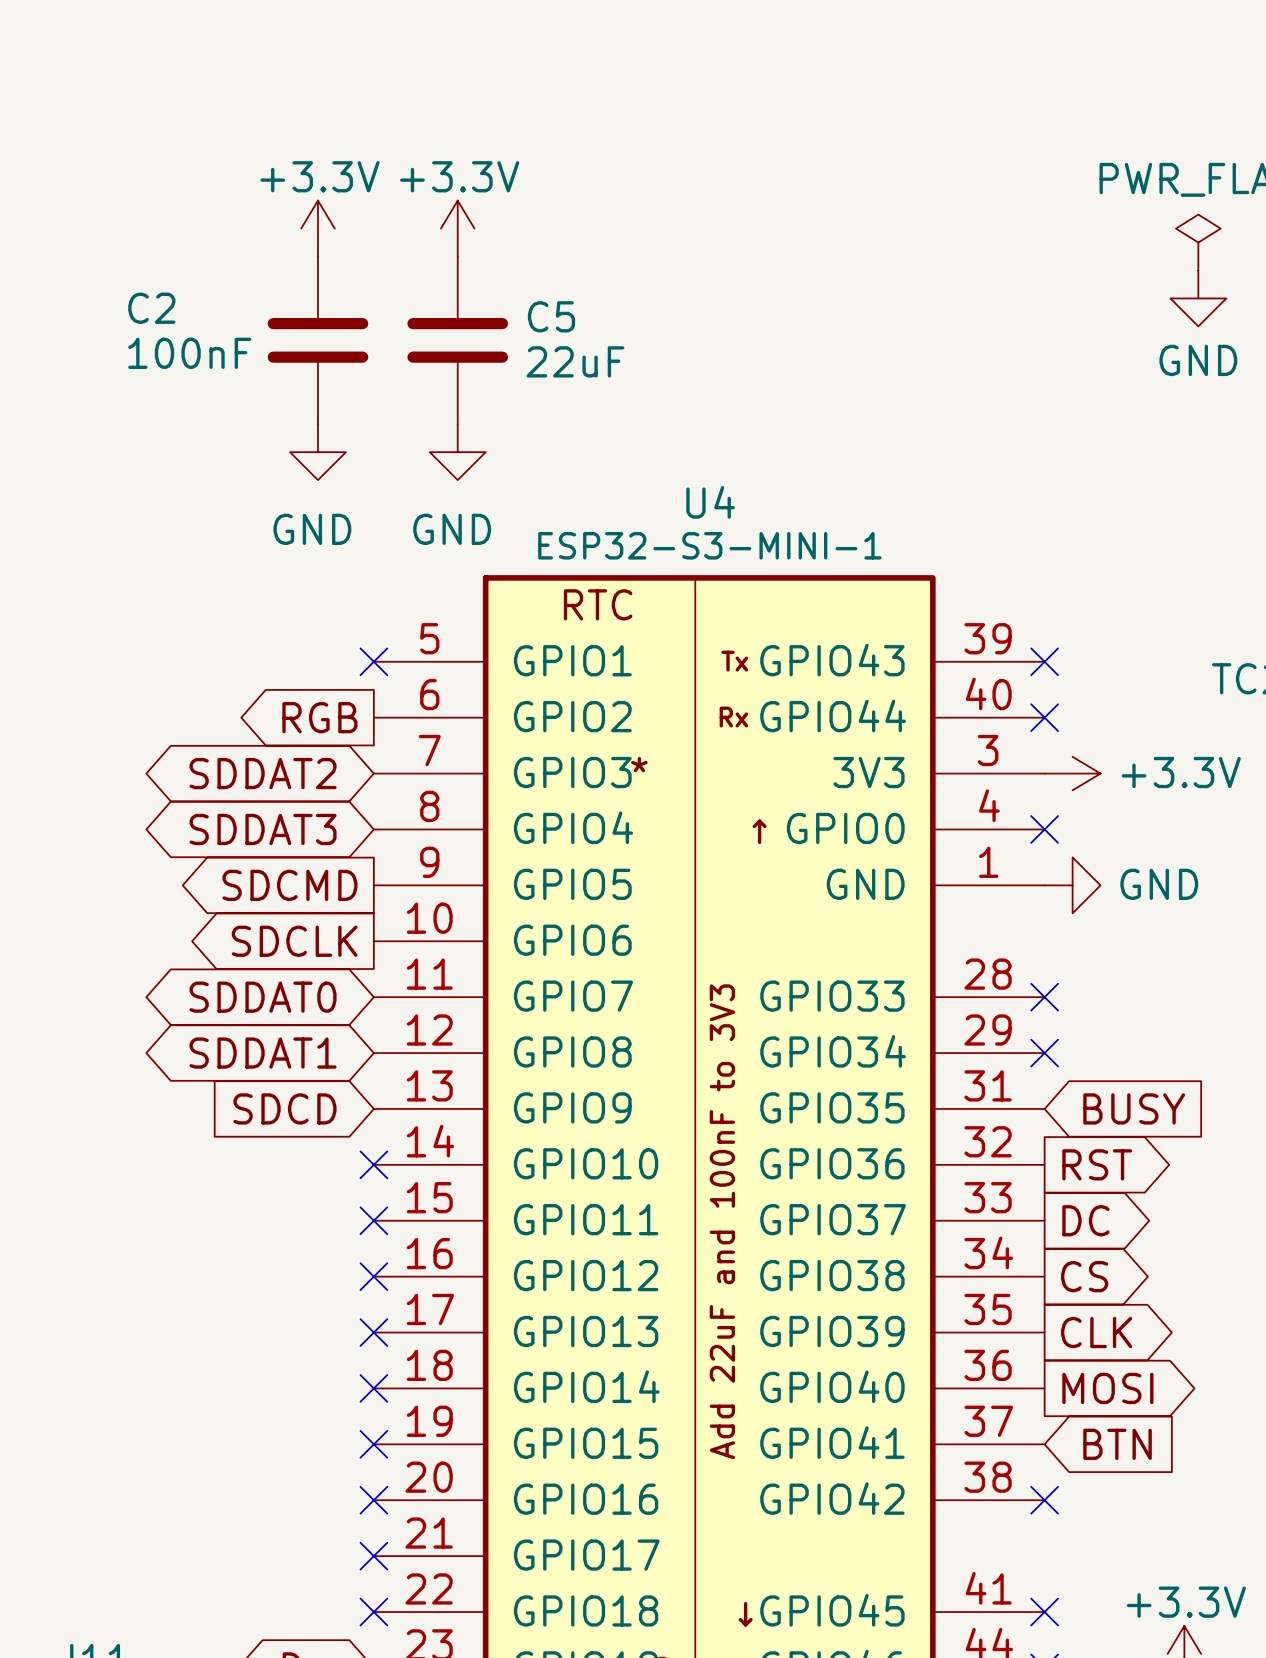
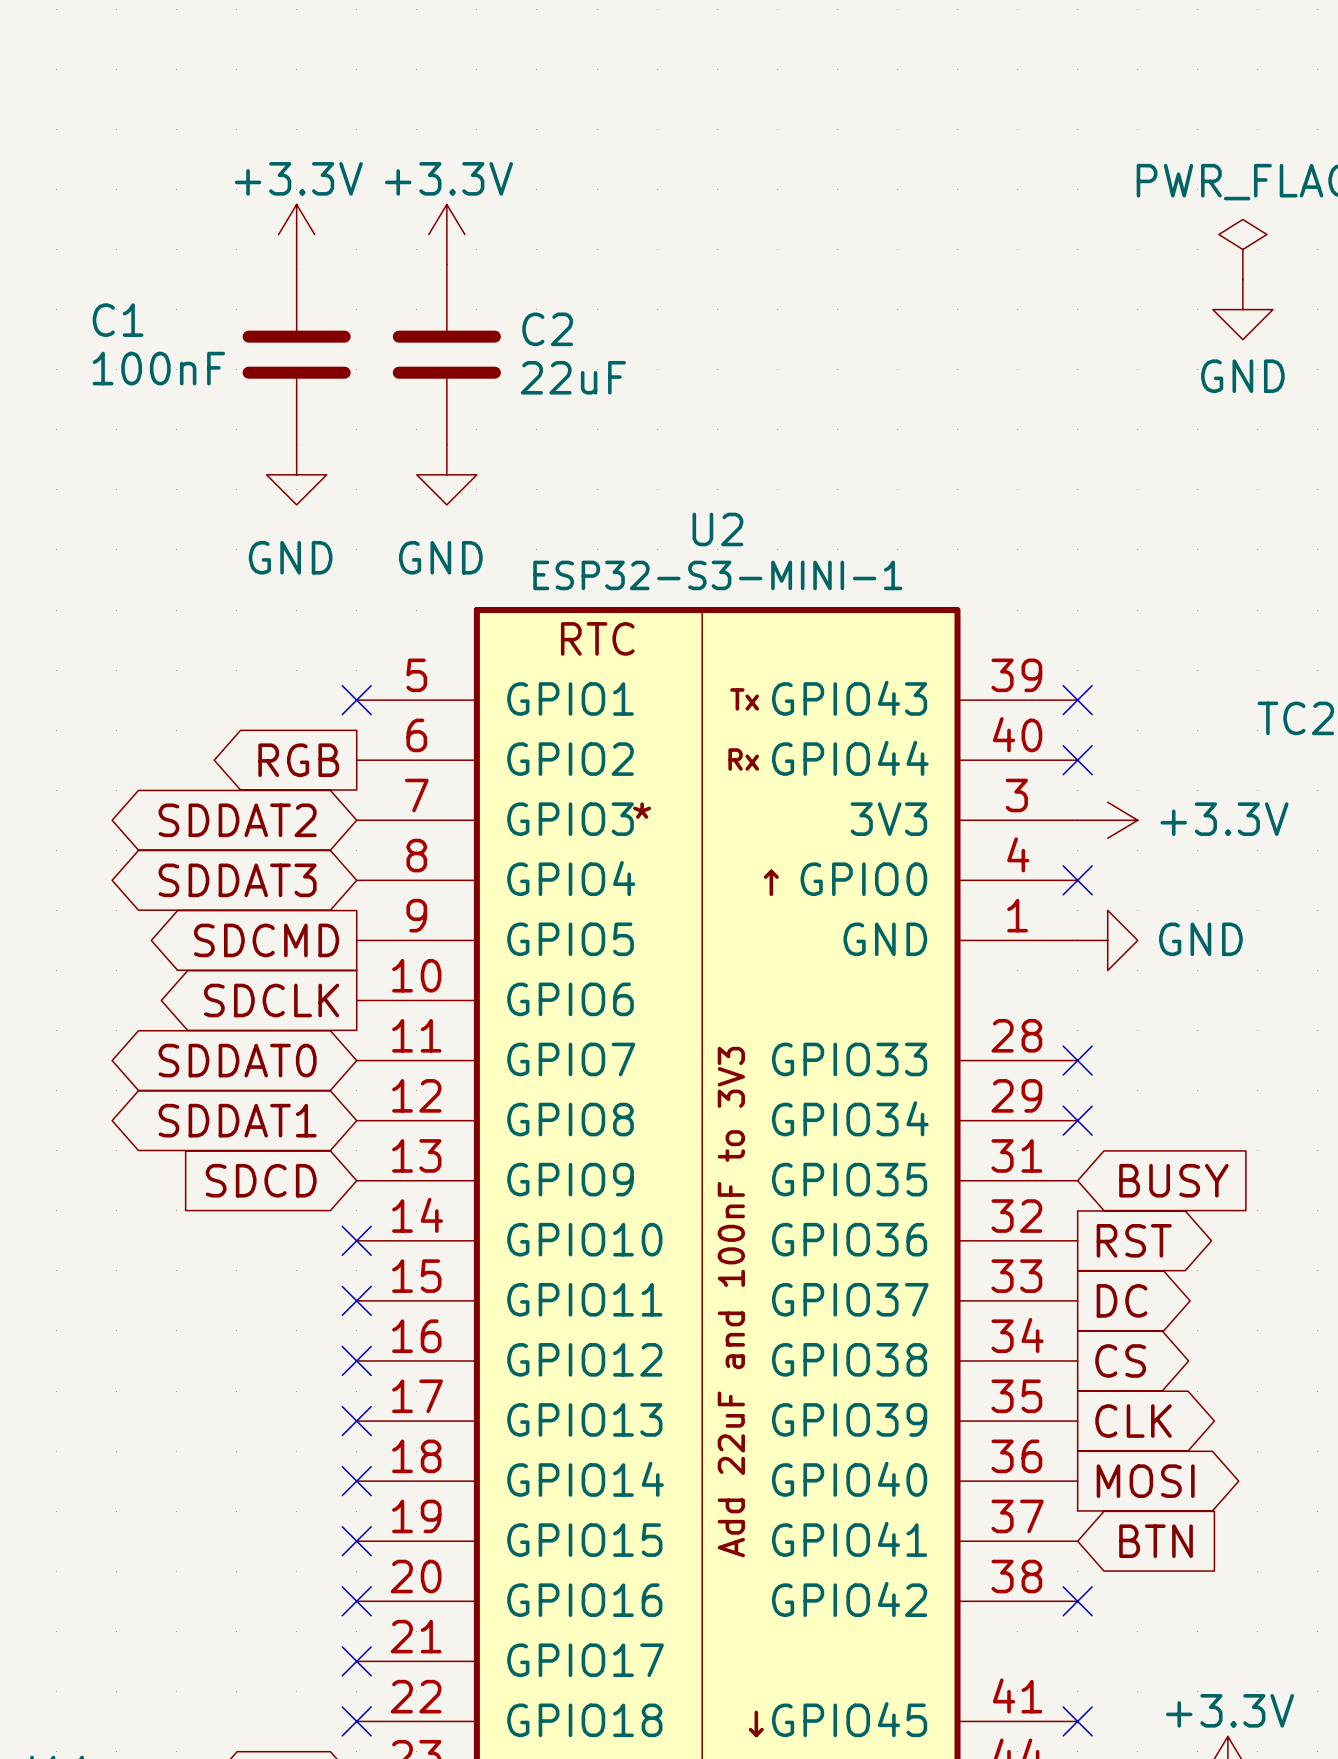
C2 name: C2 (151, 308) -> C1 (118, 320)
C5 name: C5 (551, 316) -> C2 (547, 329)
U4 name: U4 (710, 502) -> U2 (717, 529)

